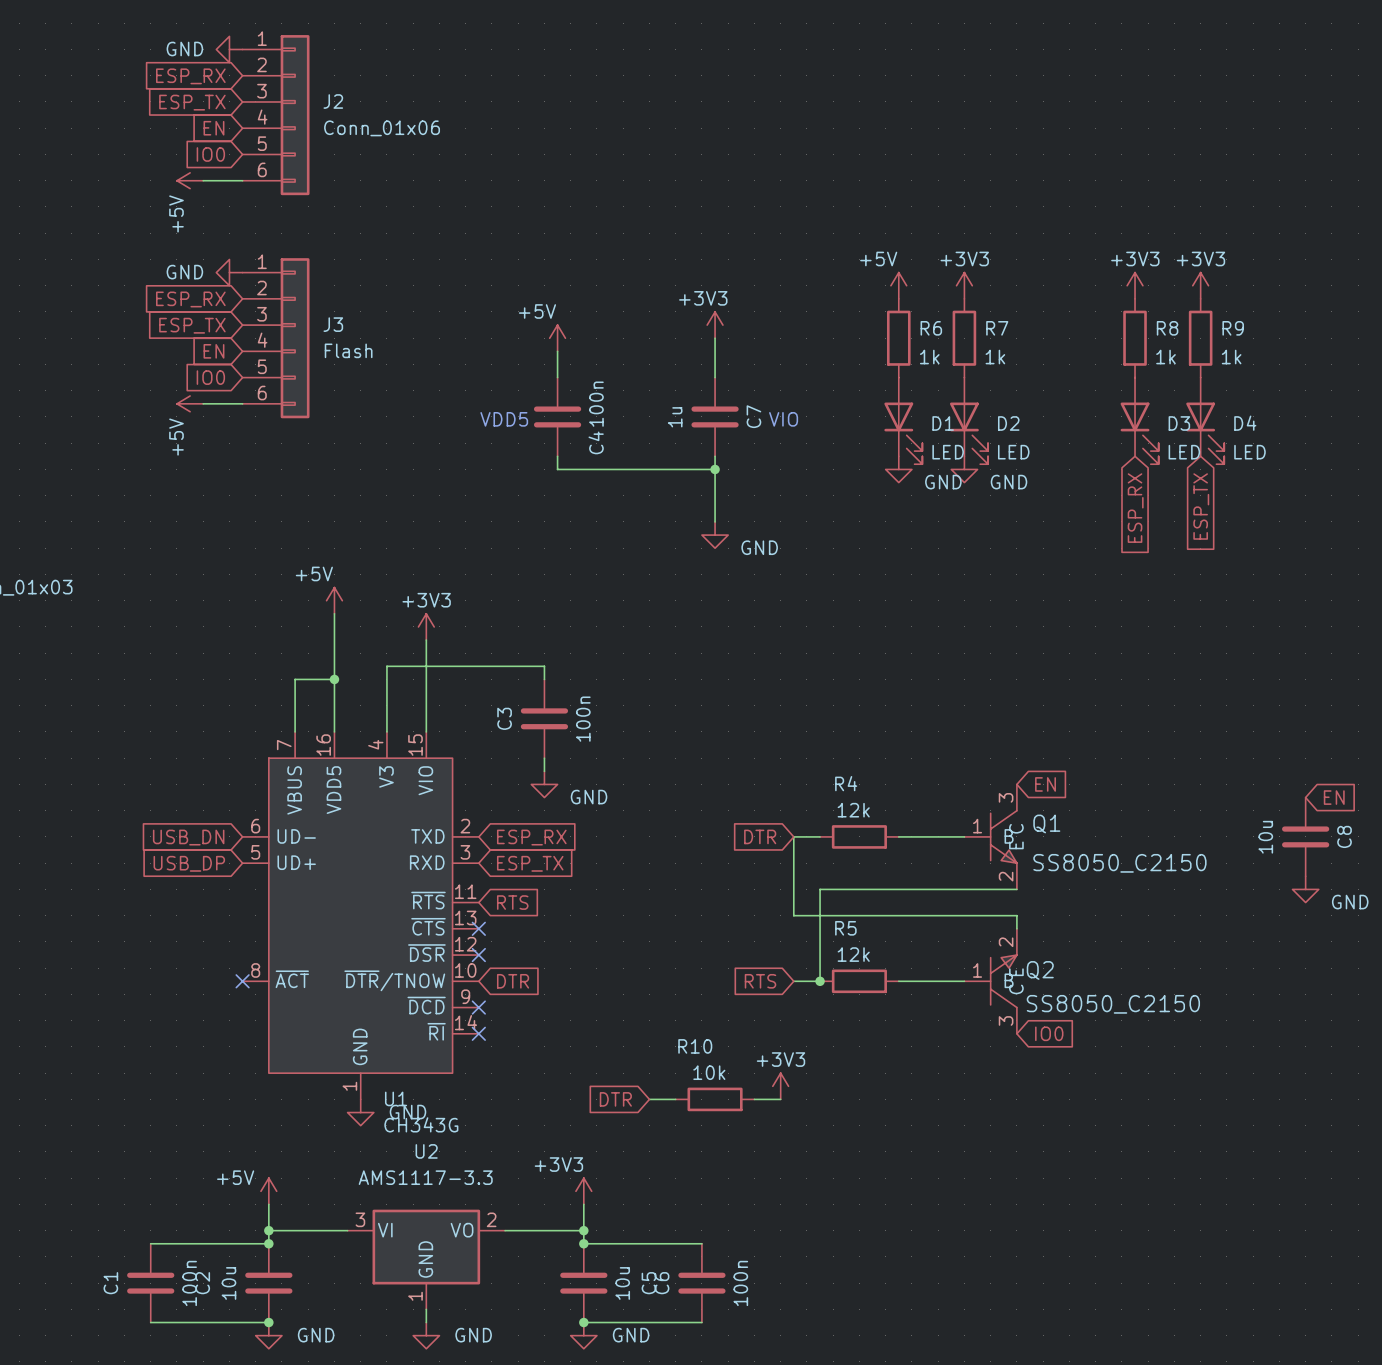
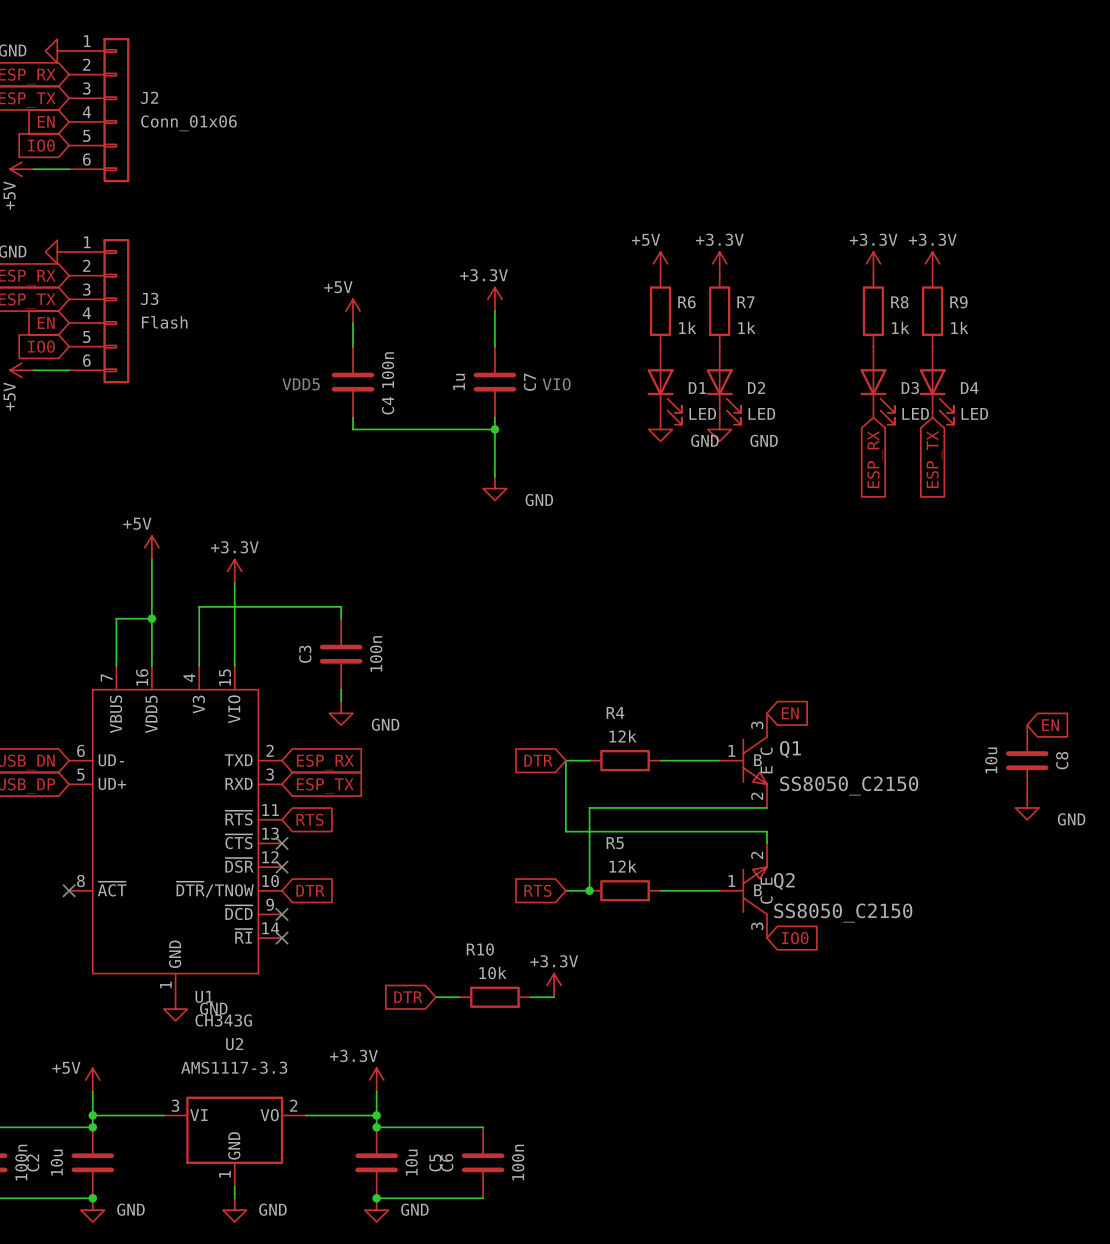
power symbol: +3V3 (964, 285) -> +3.3V (719, 263)
power symbol: +3V3 (1135, 285) -> +3.3V (873, 263)
power symbol: +3V3 (1200, 285) -> +3.3V (932, 263)
power symbol: +3V3 (715, 325) -> +3.3V (494, 299)
power symbol: +3V3 (426, 626) -> +3.3V (234, 571)
power symbol: +3V3 (780, 1086) -> +3.3V (554, 985)
power symbol: +3V3 (583, 1191) -> +3.3V (376, 1080)

